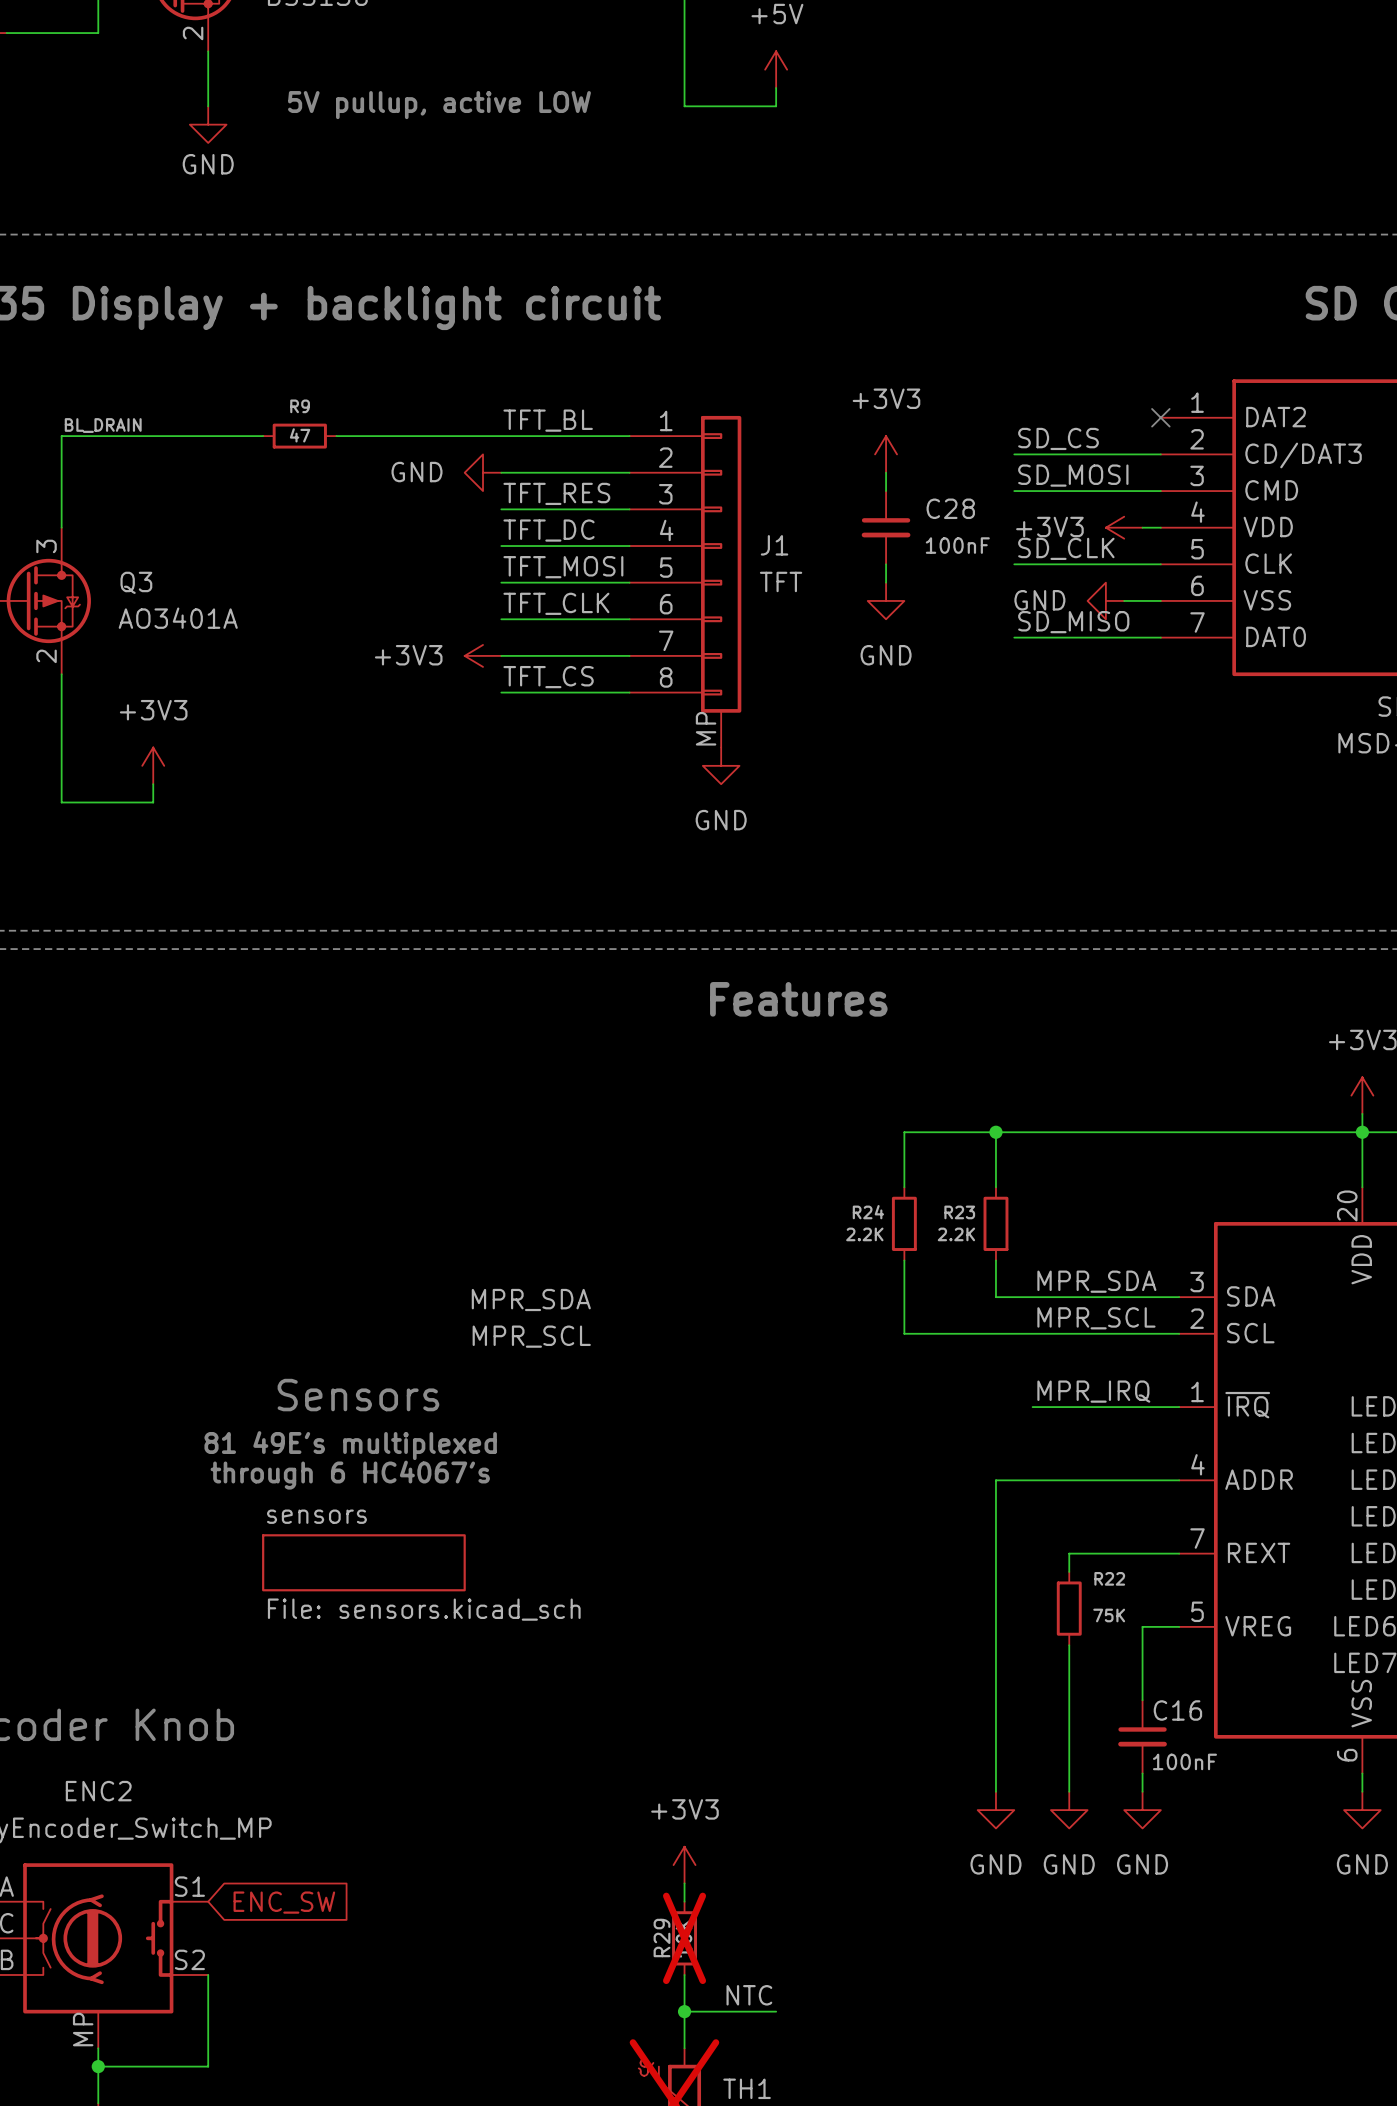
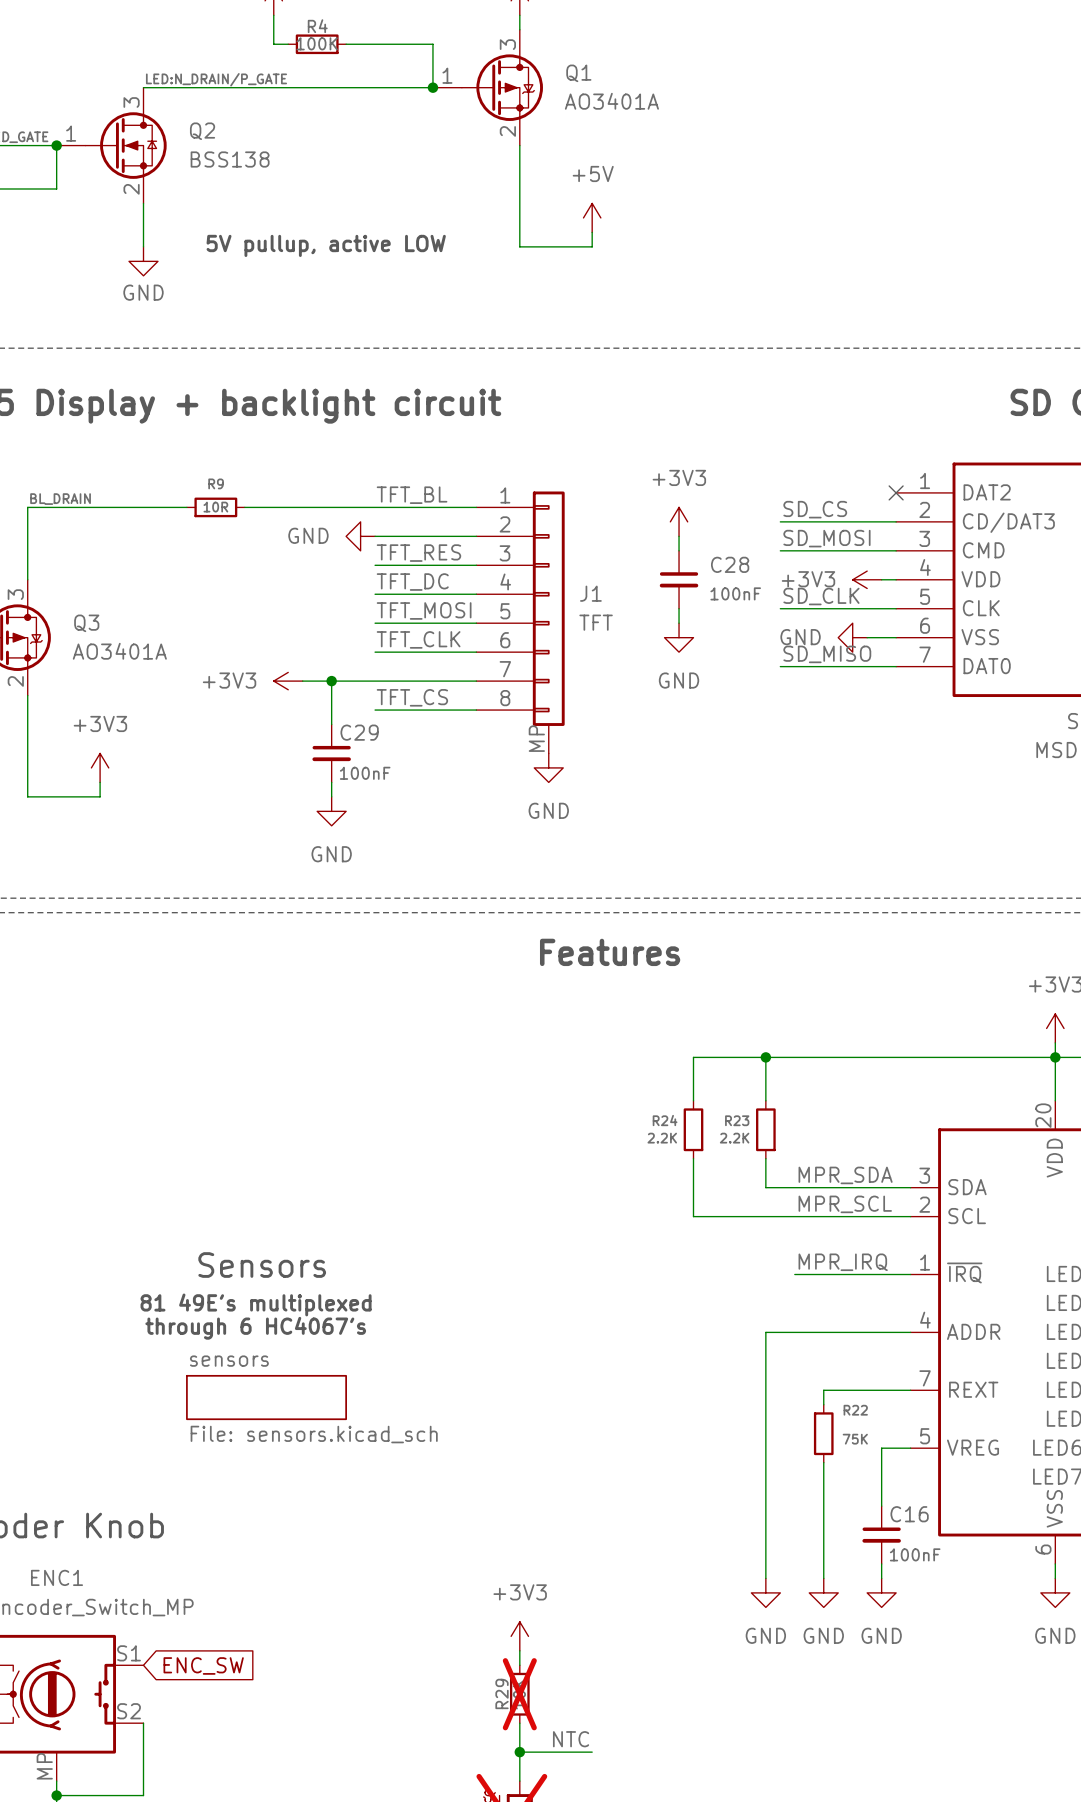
R9 value: 47 (300, 435) -> 10R (215, 507)
wire: none -> (302, 681) (375, 681)
wire: none -> (331, 681) (331, 724)
junction: none -> (331, 681)
power symbol position: +3V3 (483, 655) -> +3V3 (288, 681)
C29: none -> 100nF (331, 753)
wire: none -> (331, 782) (331, 796)
power symbol: none -> GND (331, 811)
label: MPR_SDA (531, 1299) -> none
label: MPR_SCL (531, 1336) -> none
ENC2 name: ENC2 (98, 1791) -> ENC1 (57, 1577)

